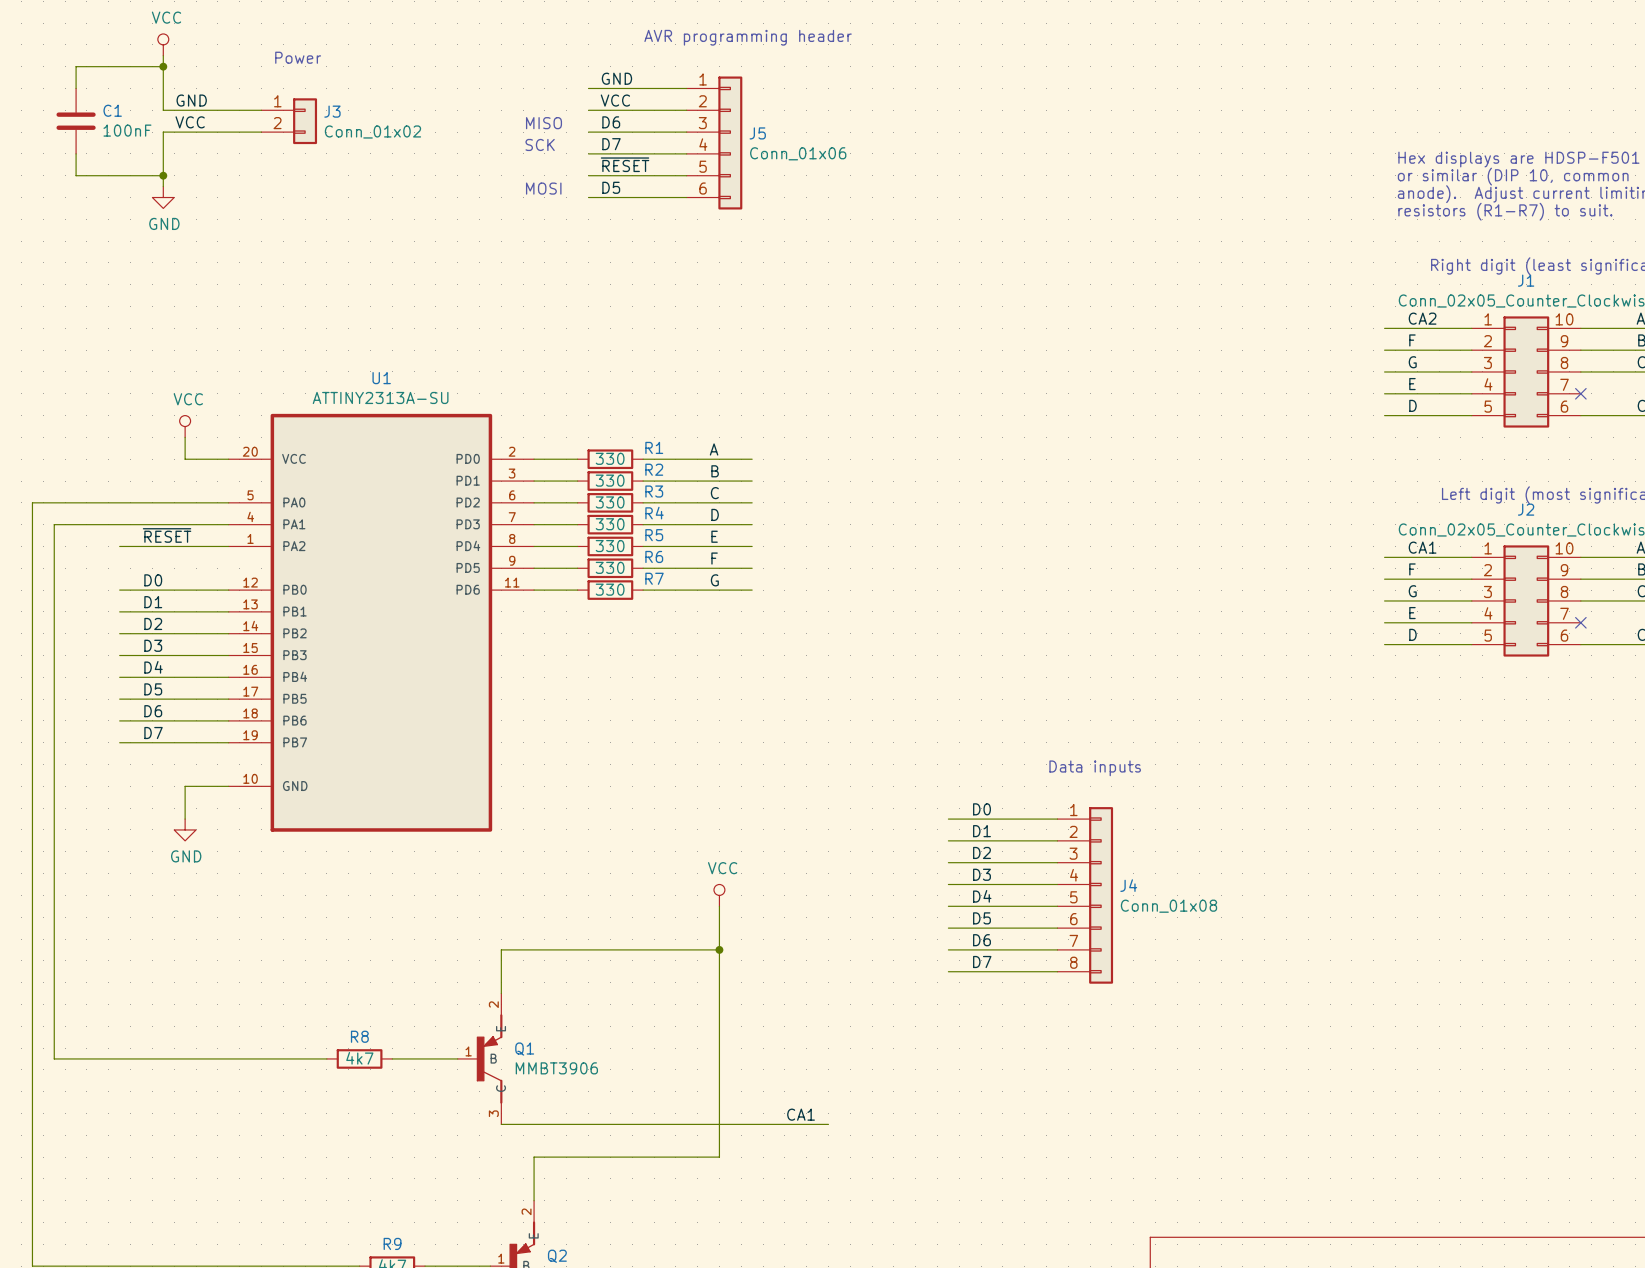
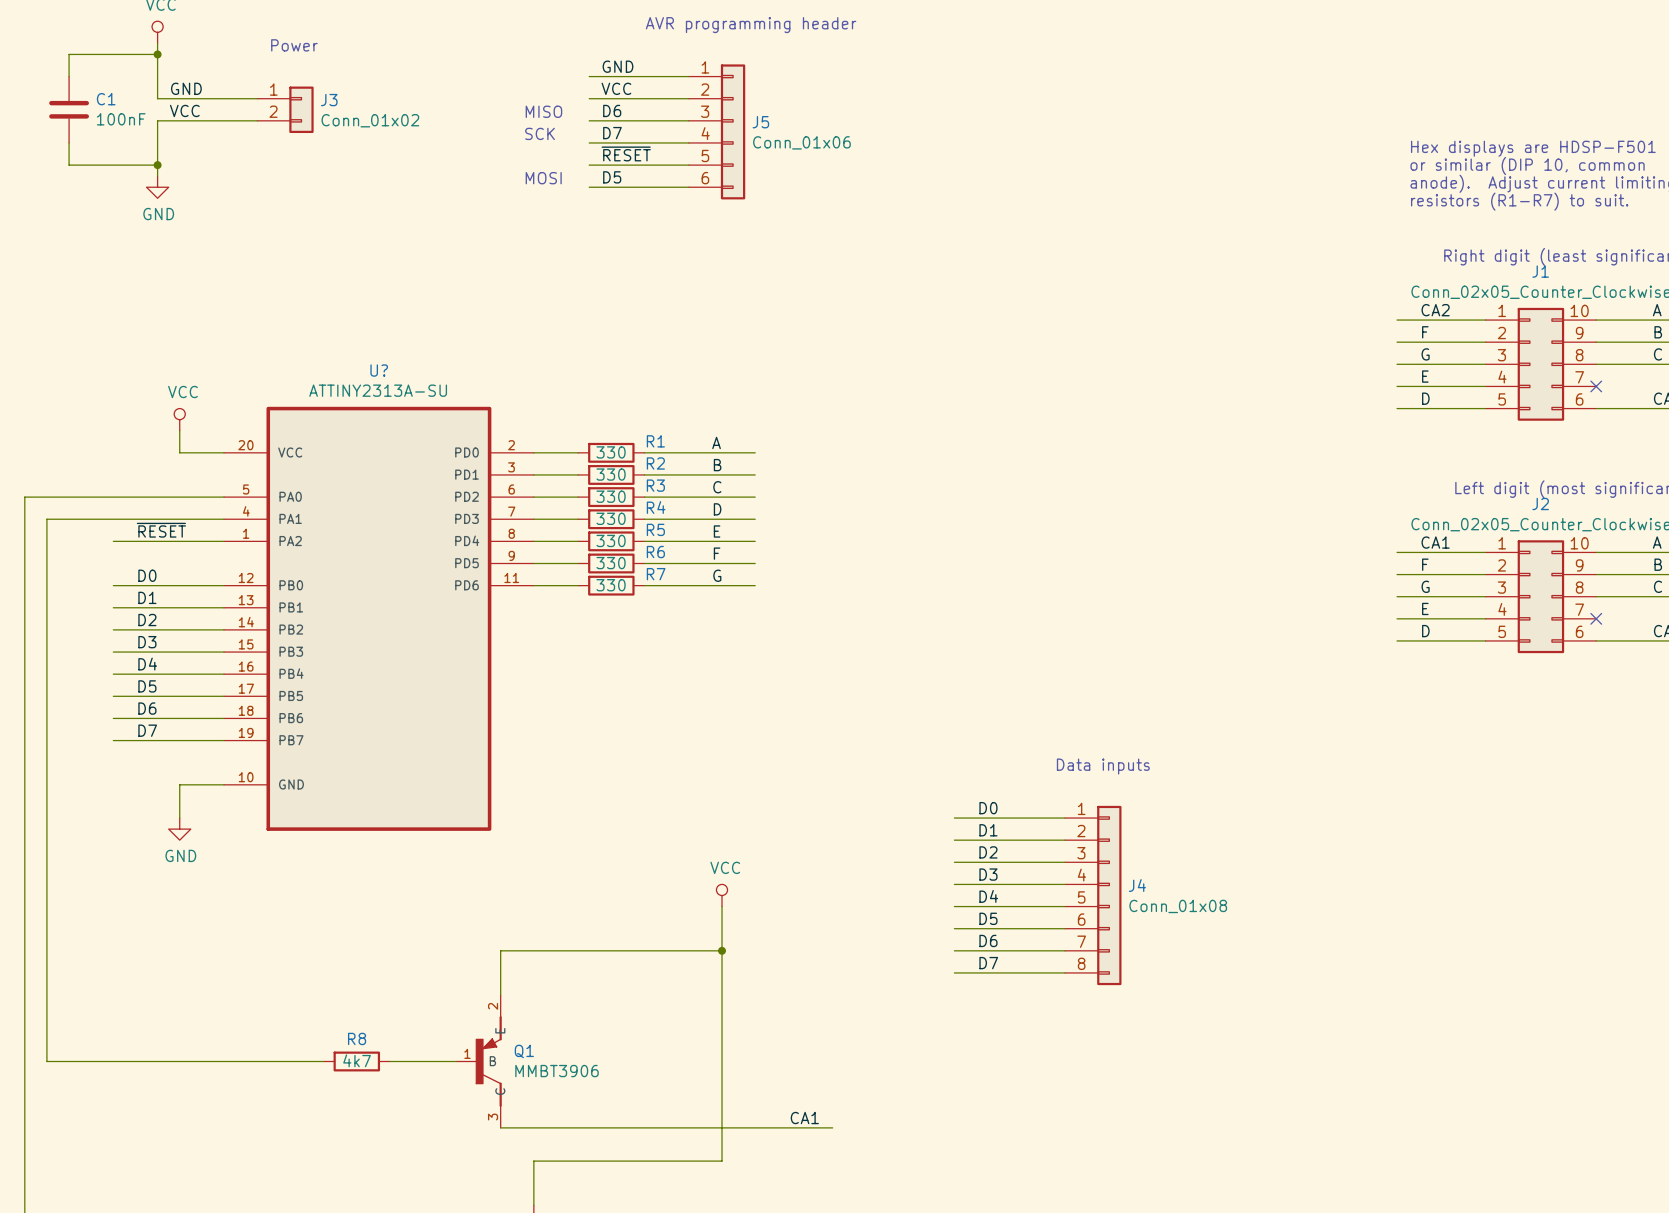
U1 name: U1 (381, 378) -> U? (379, 370)

